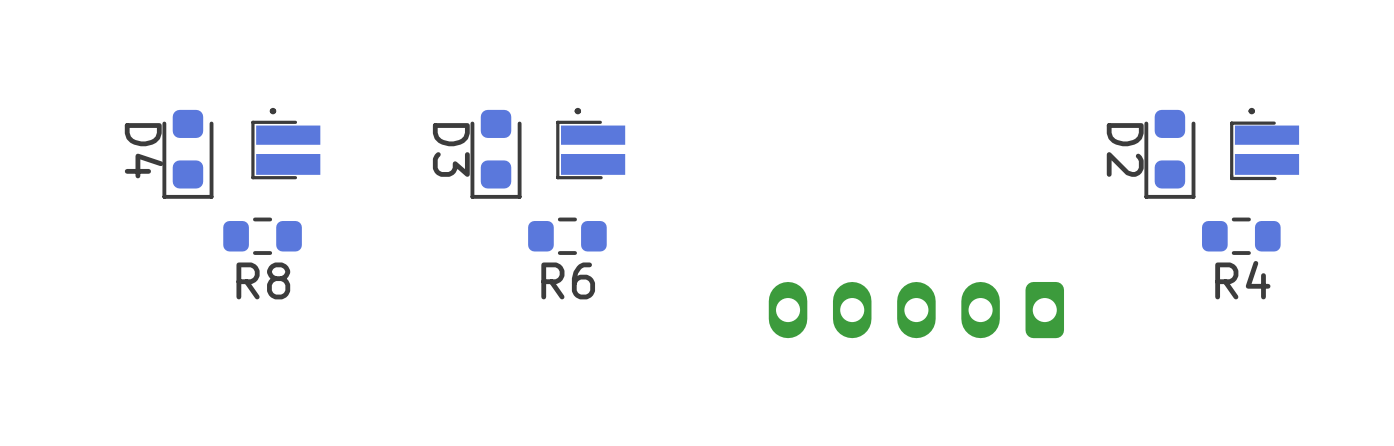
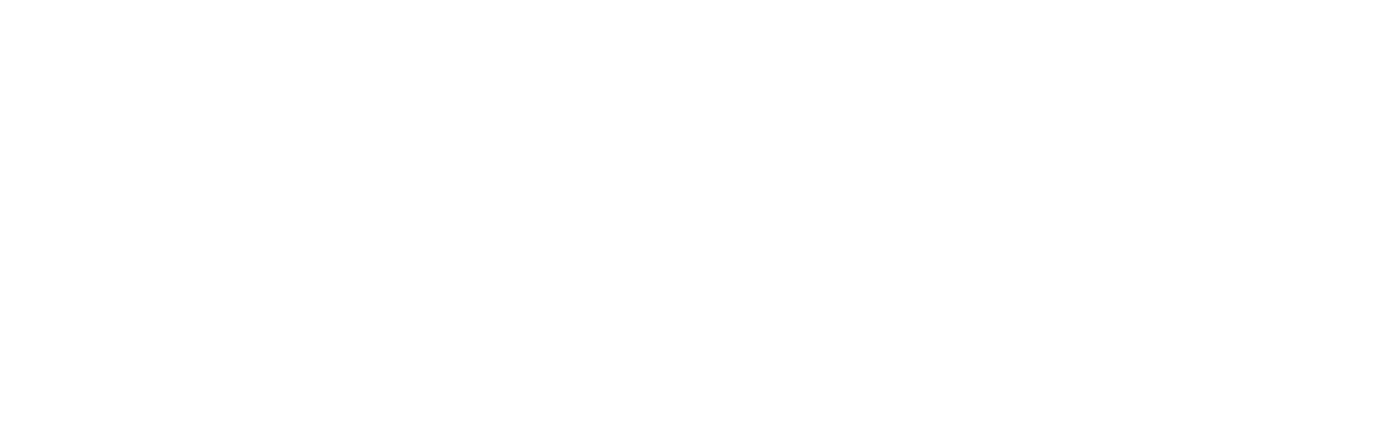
part: (285, 143) -> none
part: (590, 143) -> none
part: (1264, 143) -> none
D4: (187, 154) -> none
D3: (496, 154) -> none
D2: (1169, 154) -> none
R8: (262, 236) -> none
R6: (567, 236) -> none
R4: (1241, 236) -> none
part: (916, 310) -> none

